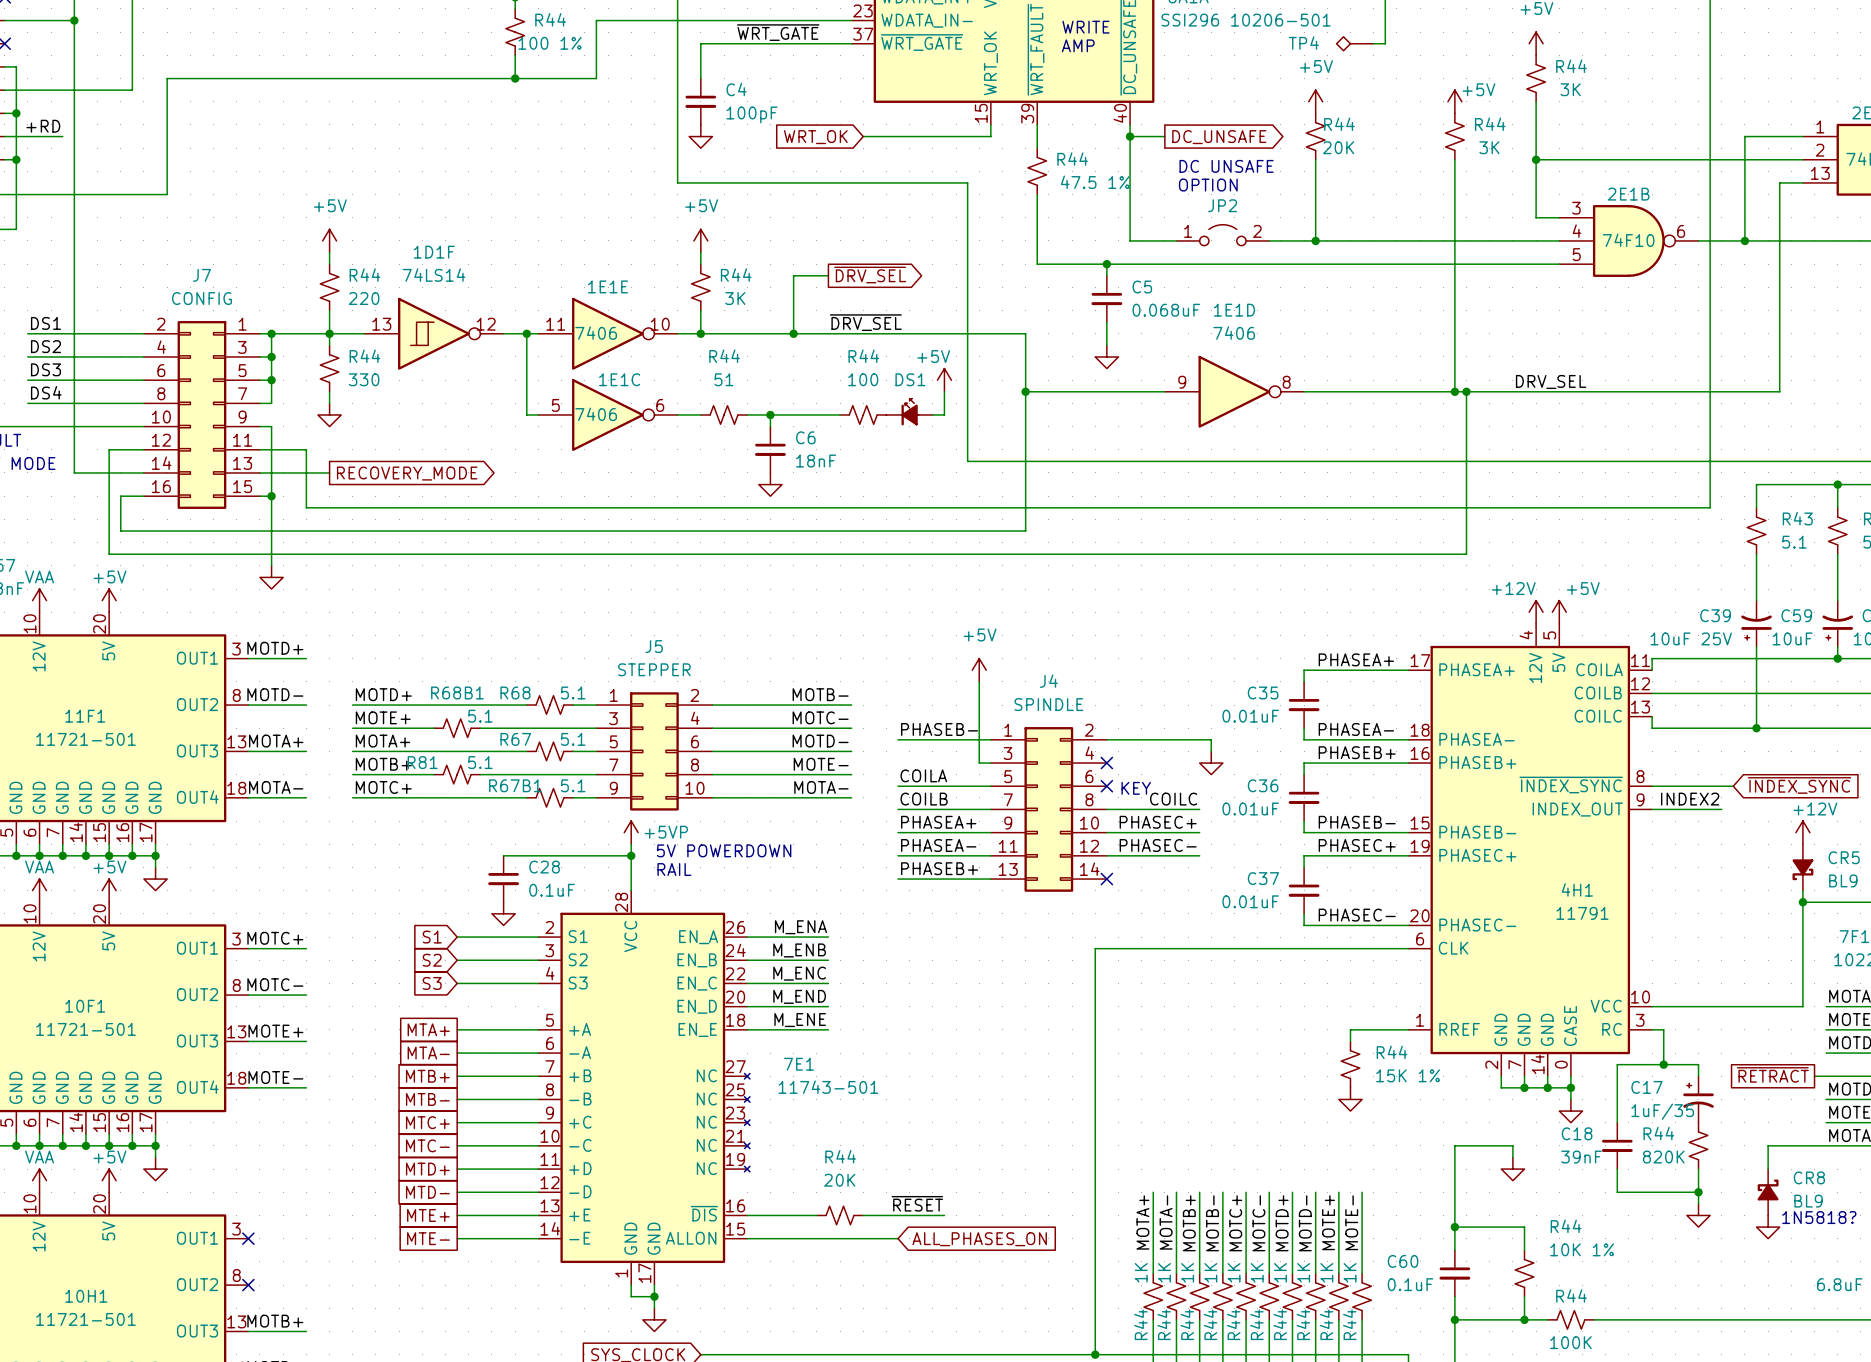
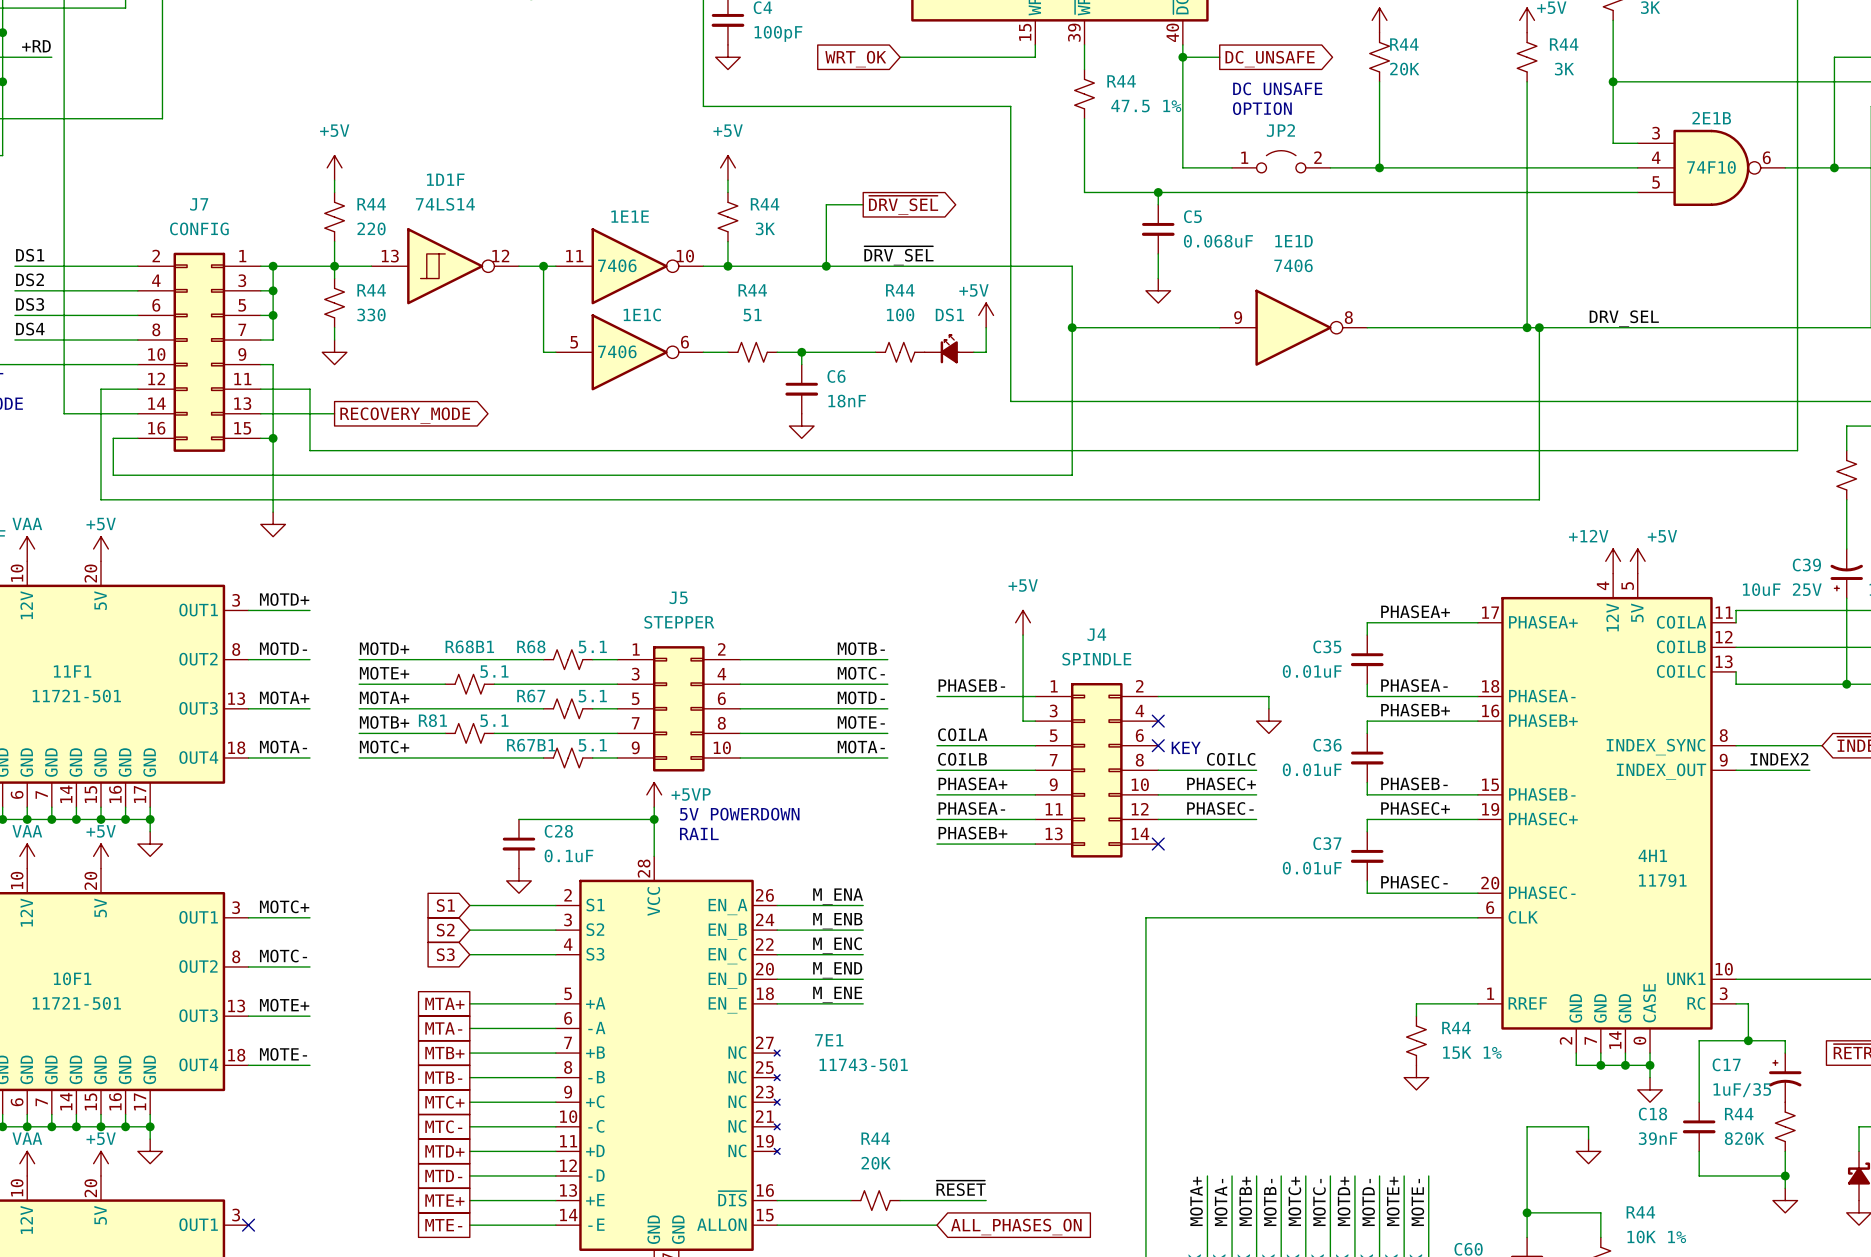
4H1 pin name: ~{INDEX_SYNC} (1571, 785) -> INDEX_SYNC (1655, 747)
4H1 pin name: VCC (1606, 1006) -> UNK1 (1686, 978)

